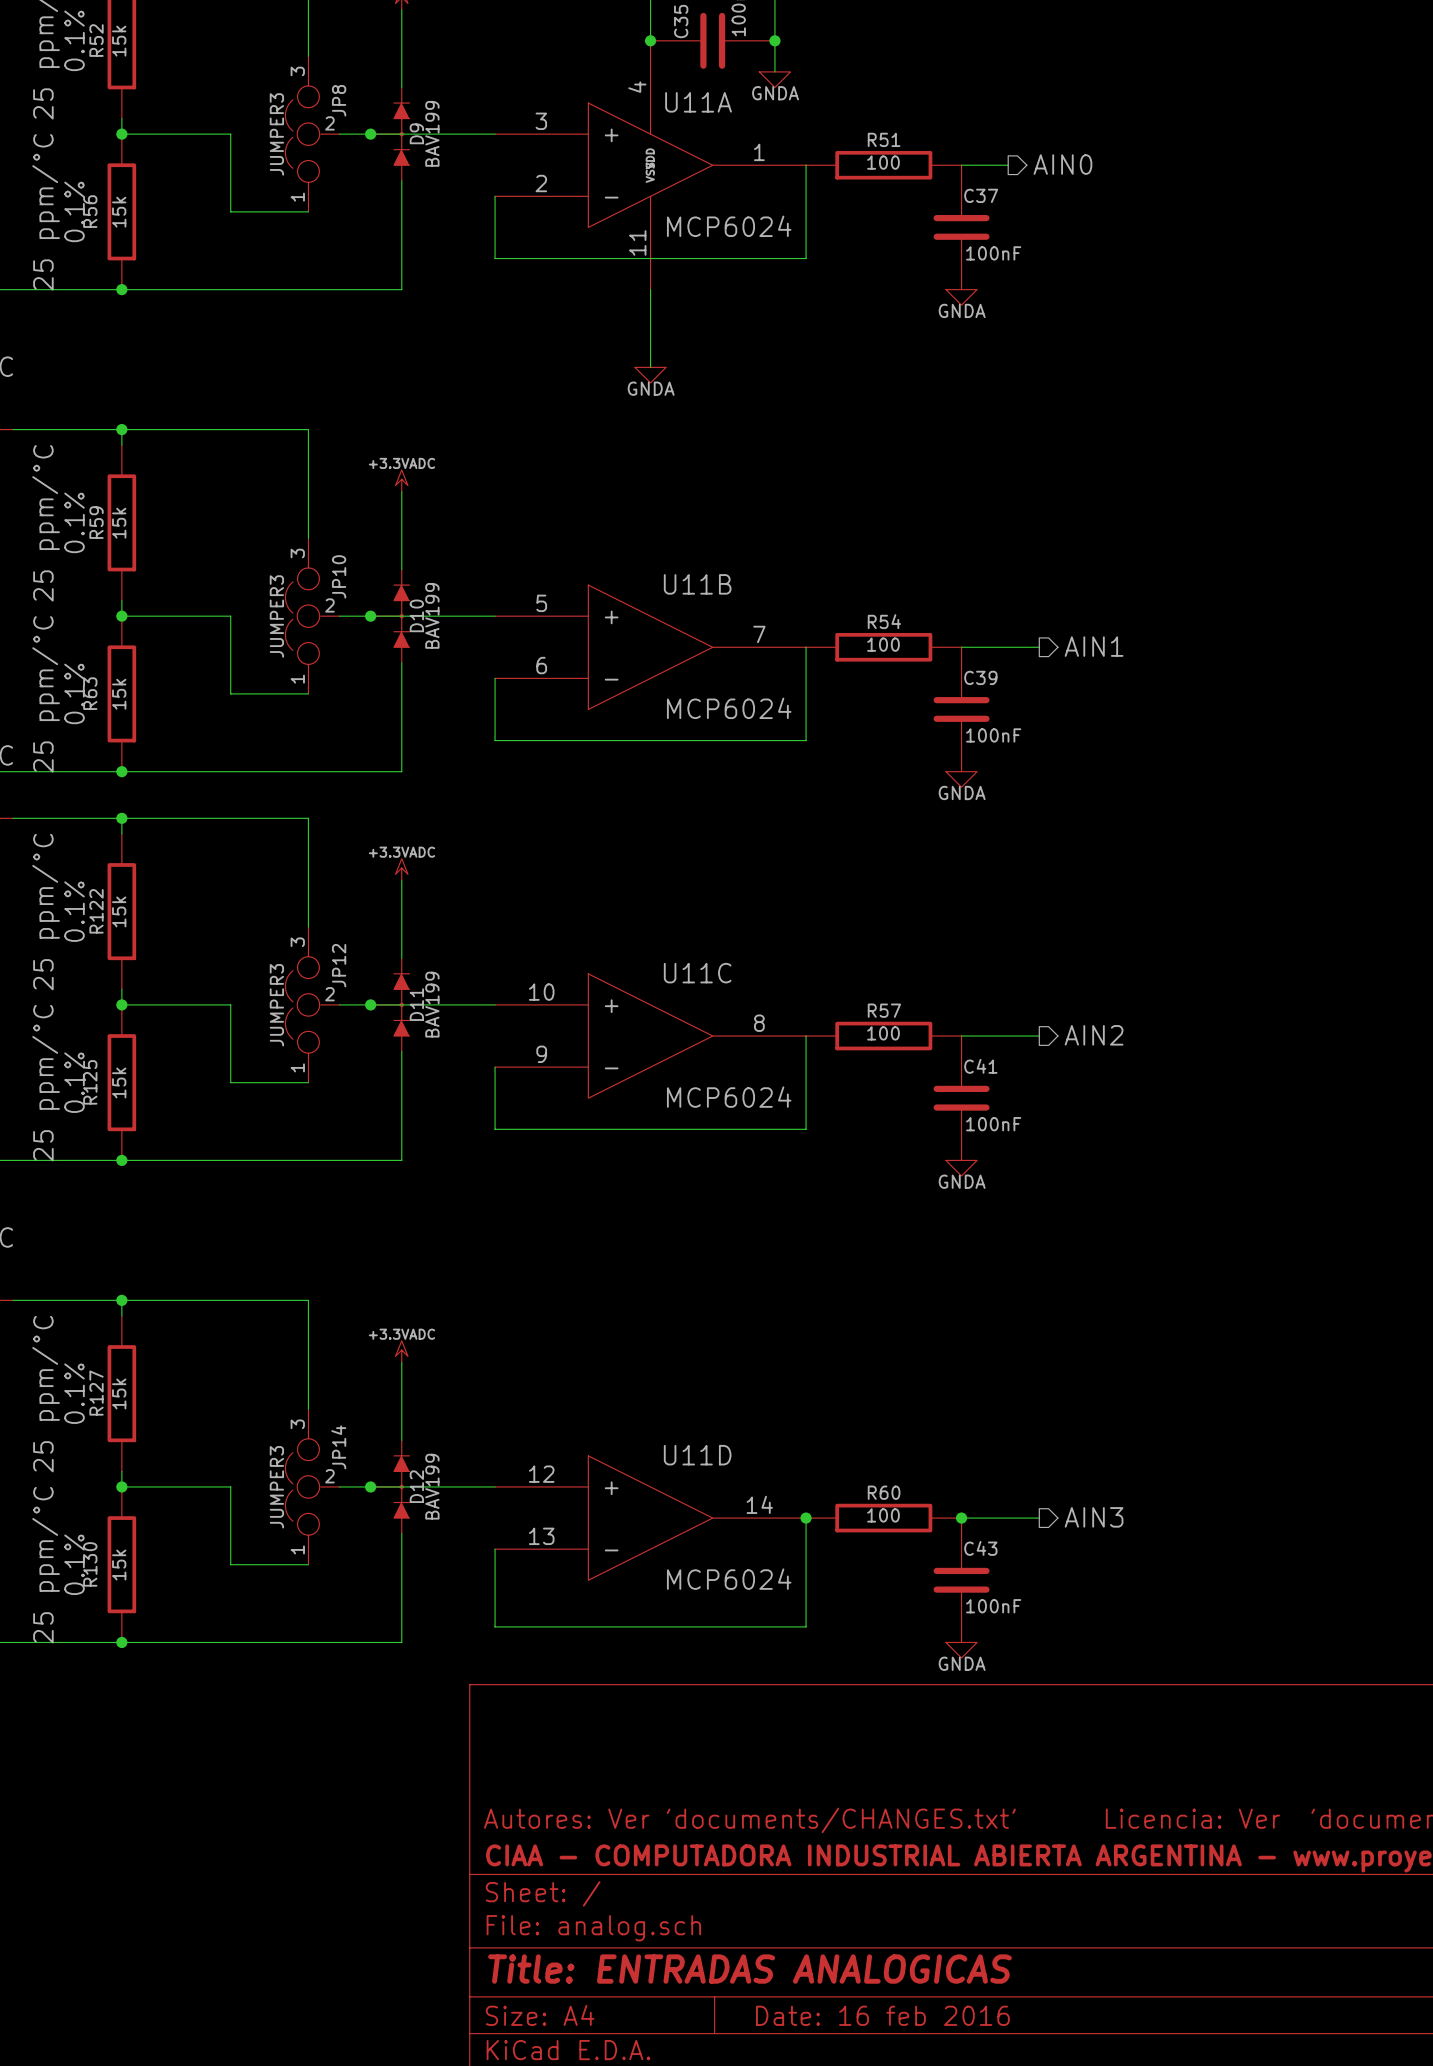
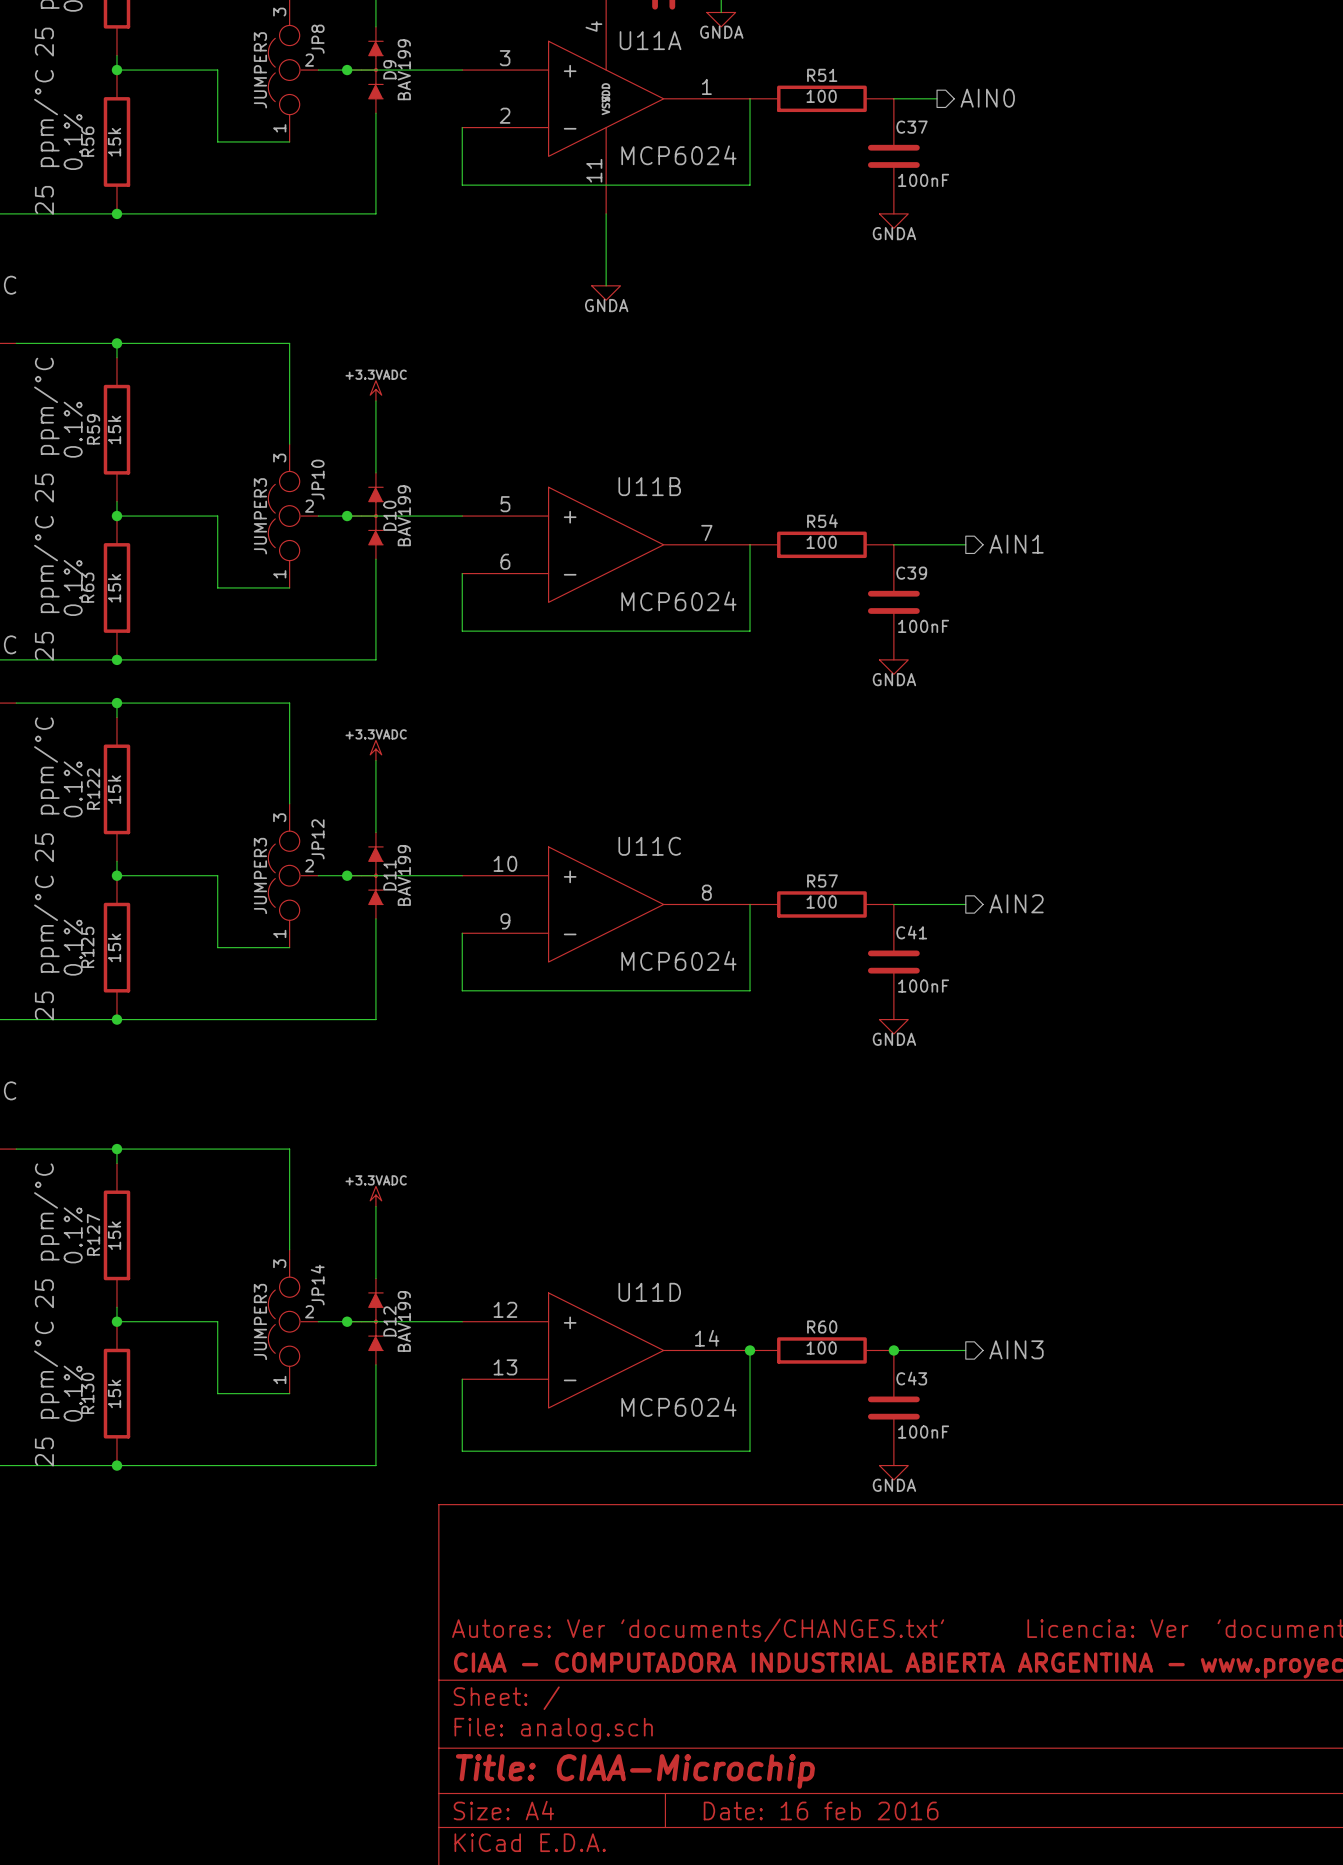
title block: Title: ENTRADAS ANALOGICAS (749, 1969) -> Title: CIAA-Microchip (635, 1771)

